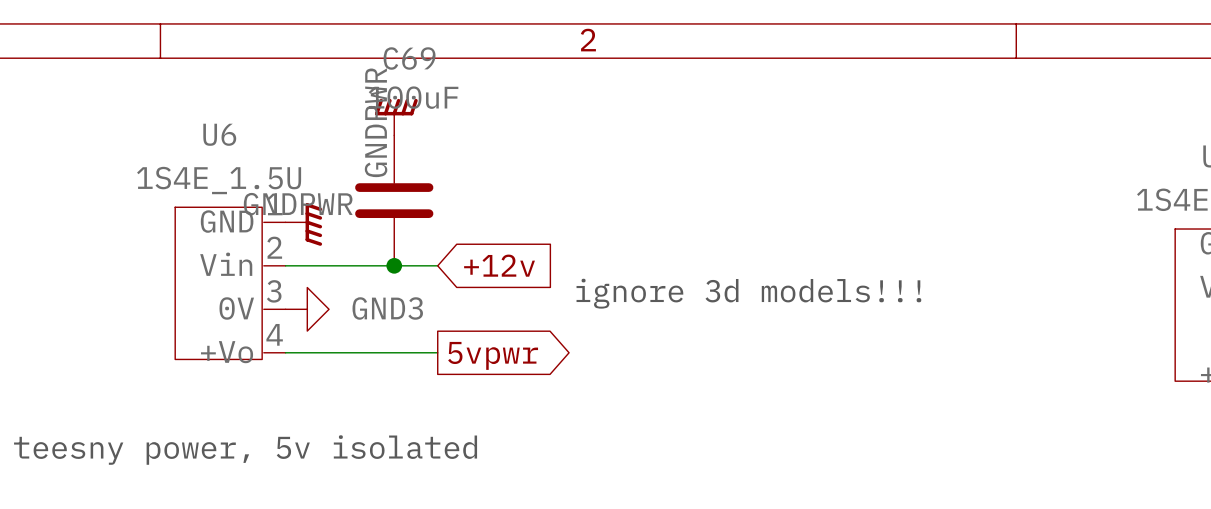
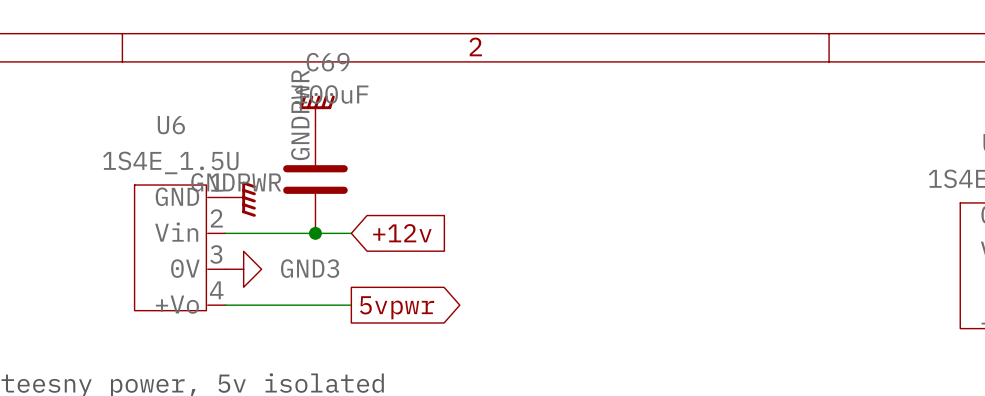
text: ignore 3d models!!! (748, 293) -> none

